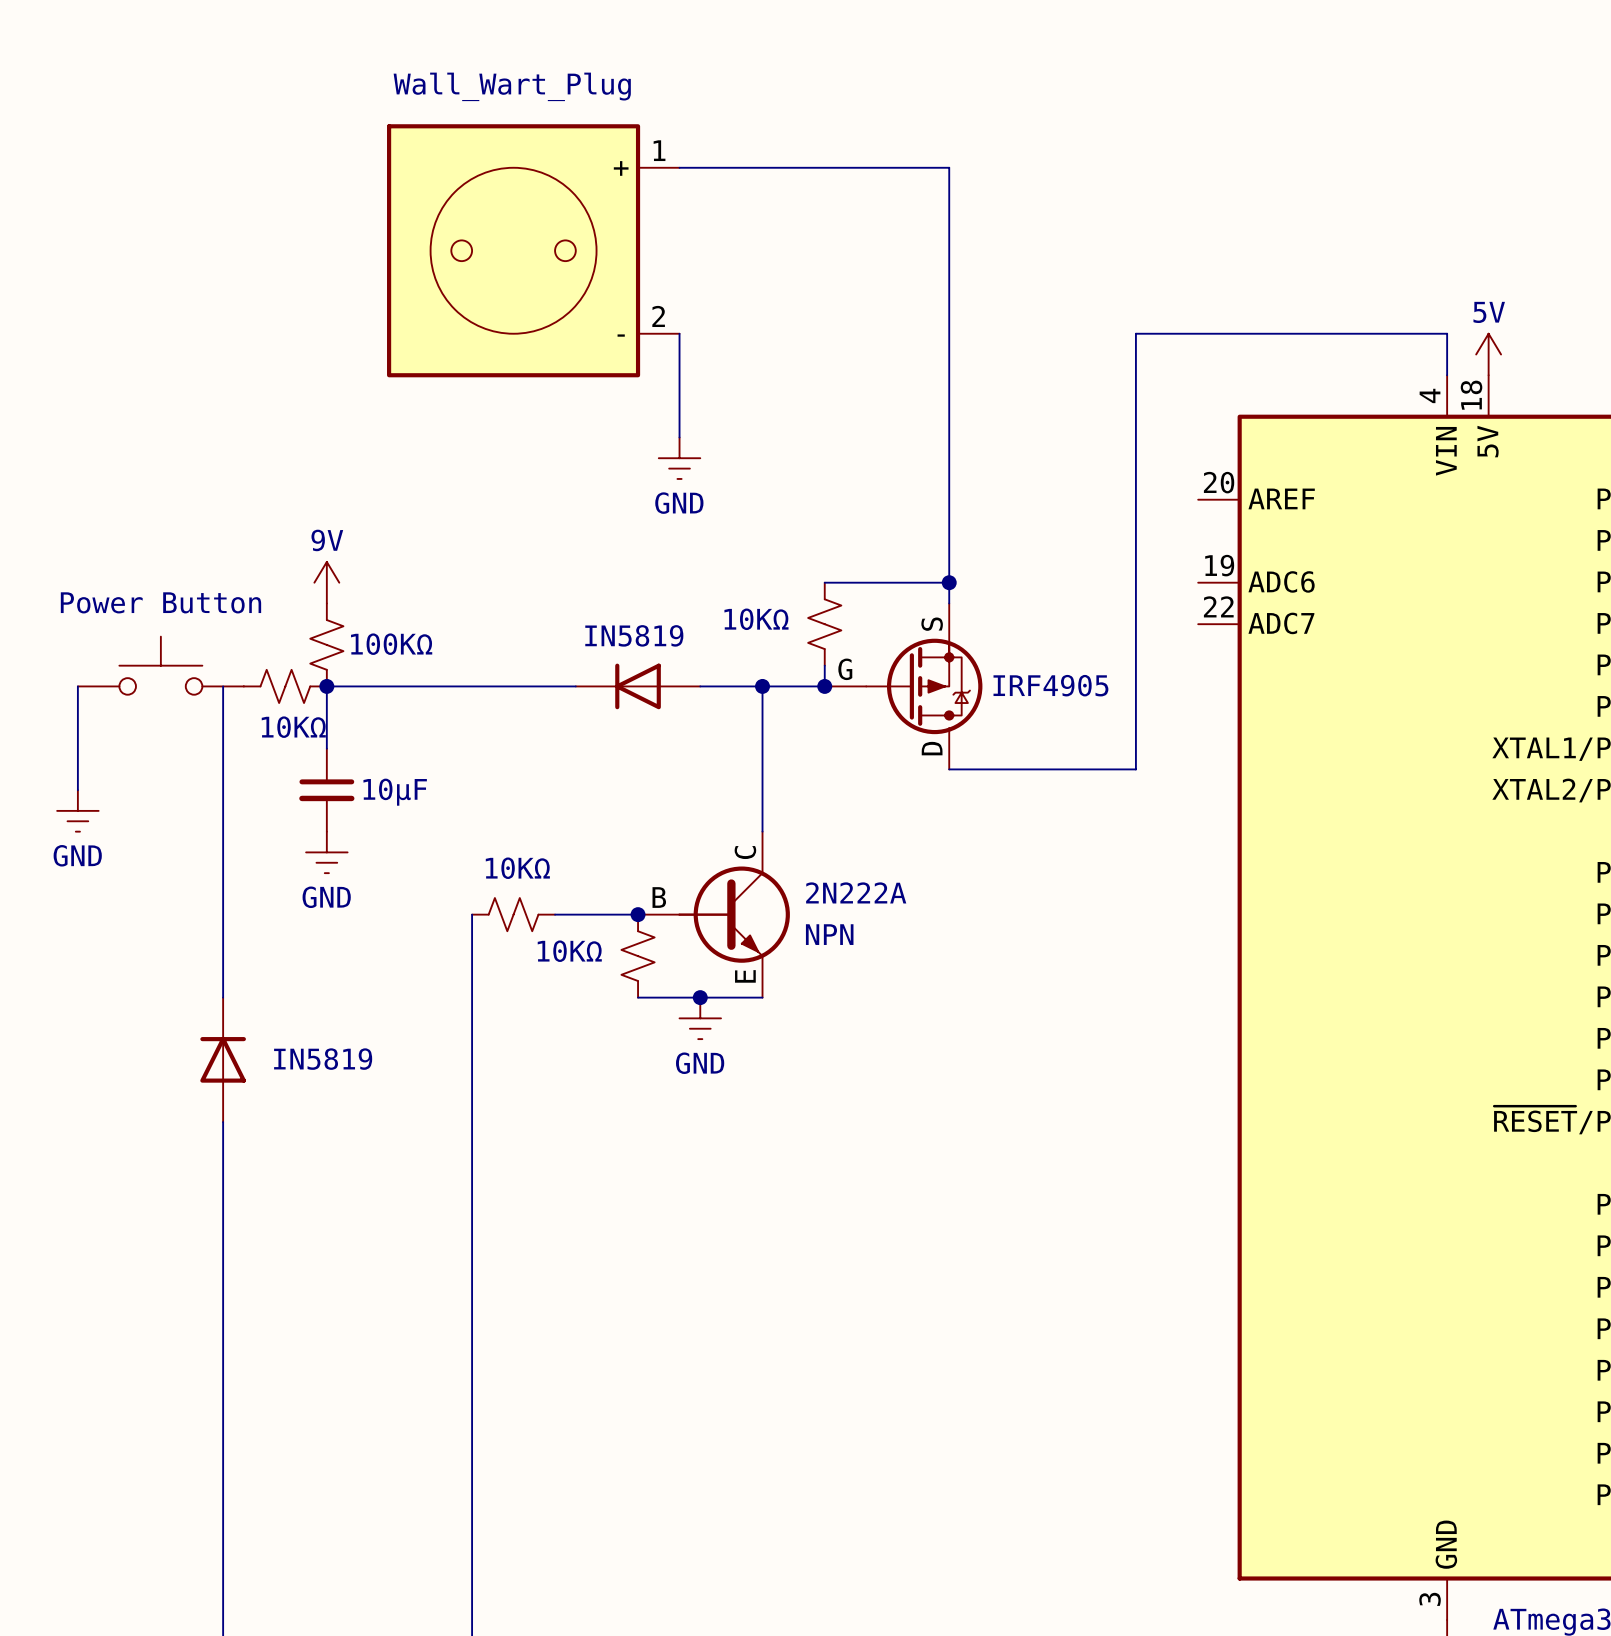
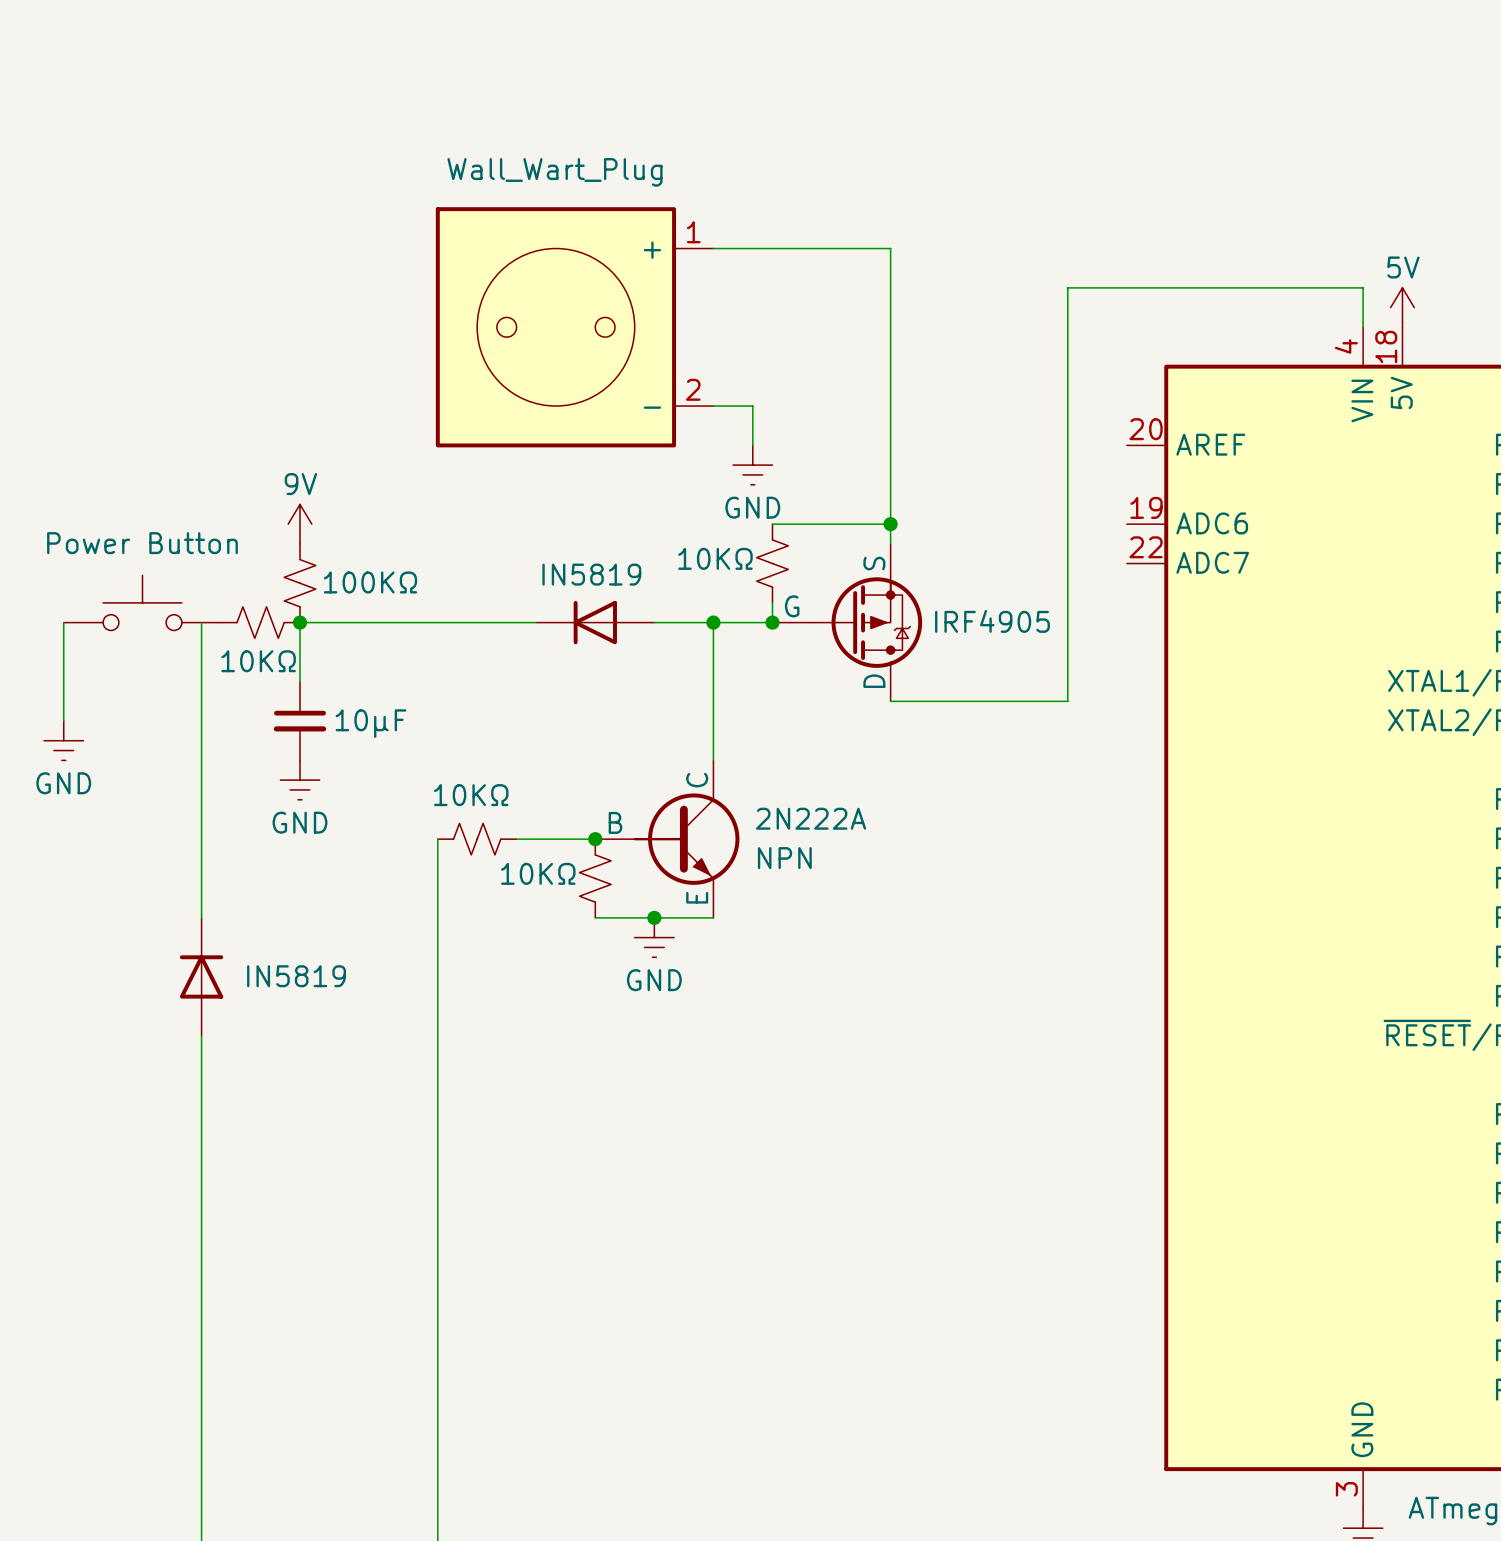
wire: (679, 167) (949, 167) (949, 292) -> (713, 248) (890, 248)
part position: (533, 250) -> (574, 327)
power symbol position: GND (679, 458) -> GND (752, 465)
wire: none -> (713, 406) (752, 406) (752, 445)

